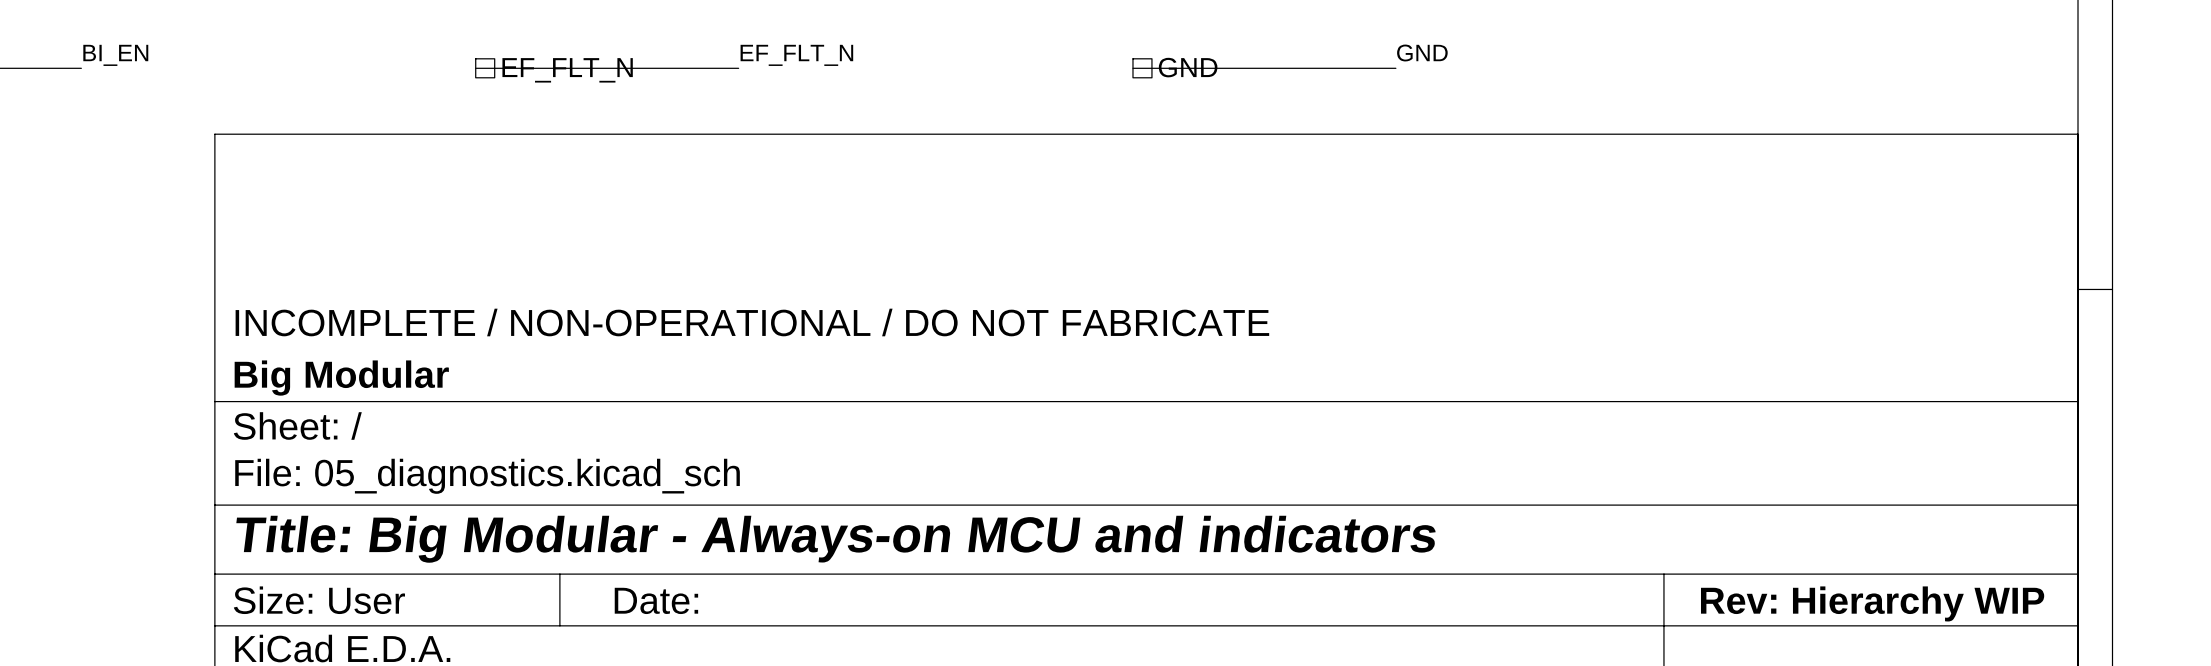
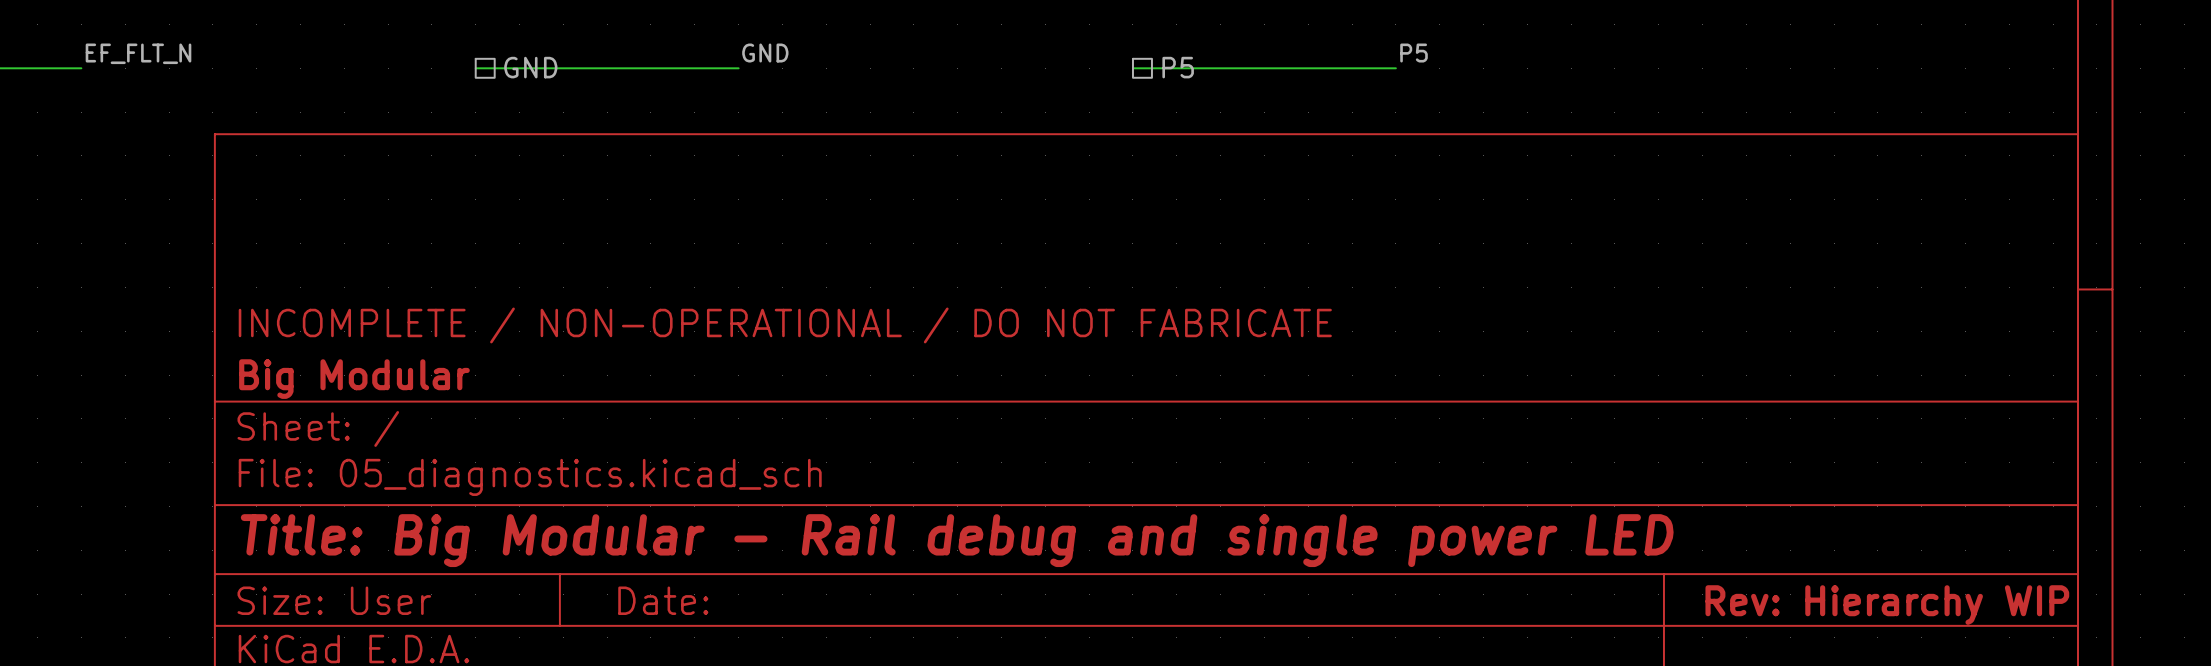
label: GND (1422, 53) -> P5 (1414, 53)
label: BI_EN (115, 55) -> EF_FLT_N (138, 53)
label: EF_FLT_N (796, 55) -> GND (765, 53)
hierarchical label: GND (1188, 67) -> P5 (1178, 67)
hierarchical label: EF_FLT_N (567, 70) -> GND (530, 67)
title block: Title: Big Modular - Always-on MCU and indicators (835, 539) -> Title: Big Modular - Rail debug and single power LED (957, 540)

